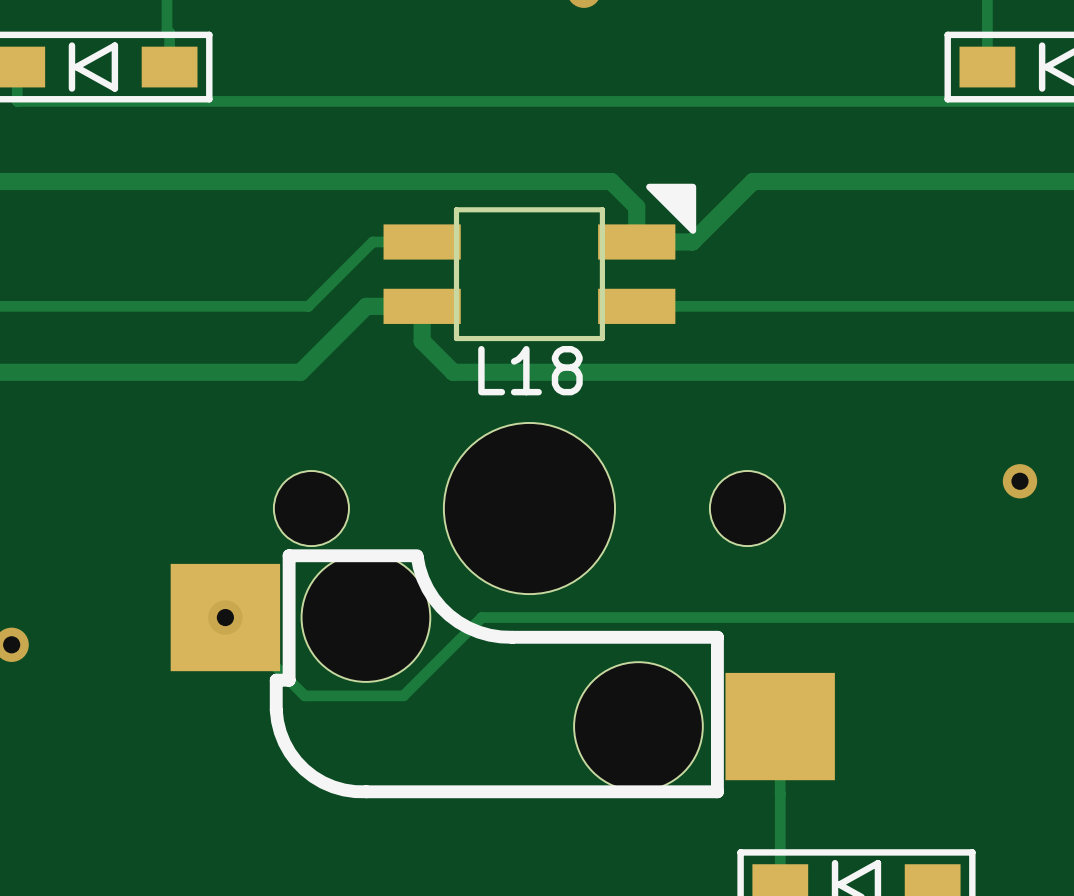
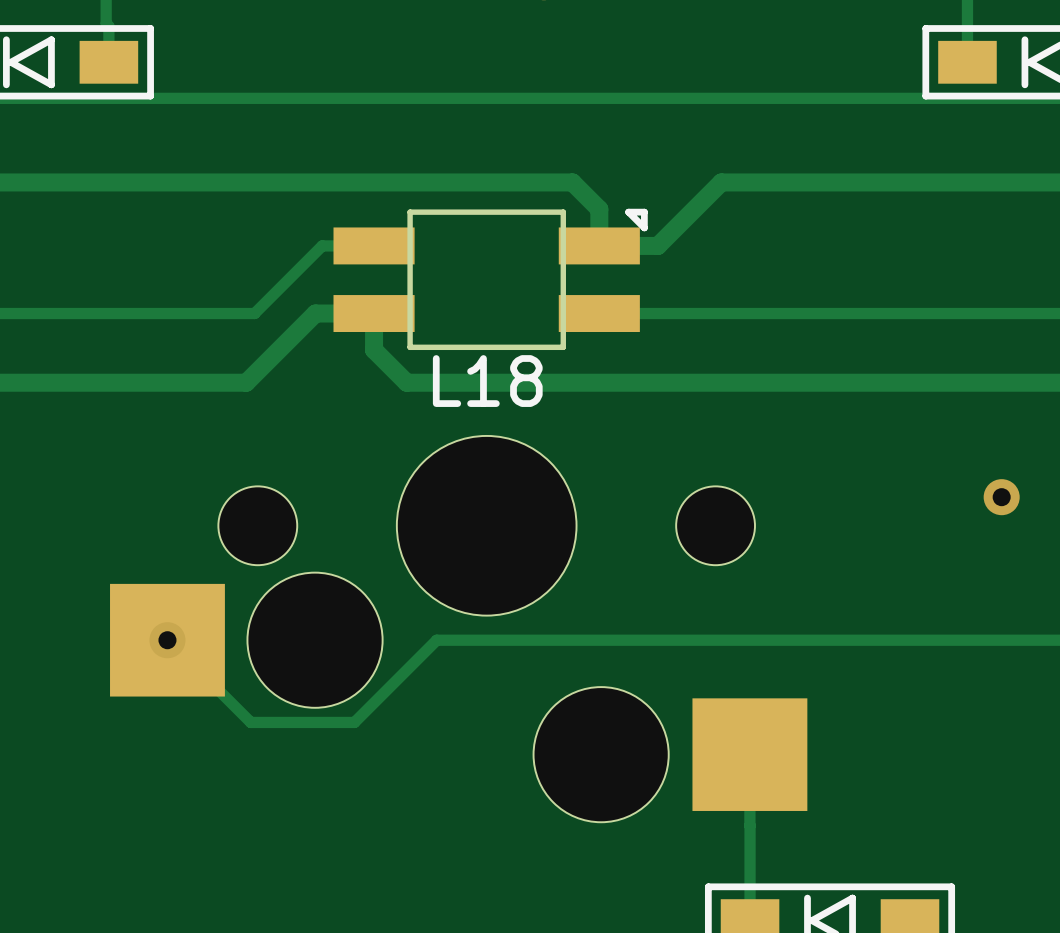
L18 footprint: [383, 183, 697, 342] -> [333, 208, 648, 351]
part footprint: [170, 422, 835, 799] -> [110, 435, 808, 823]

